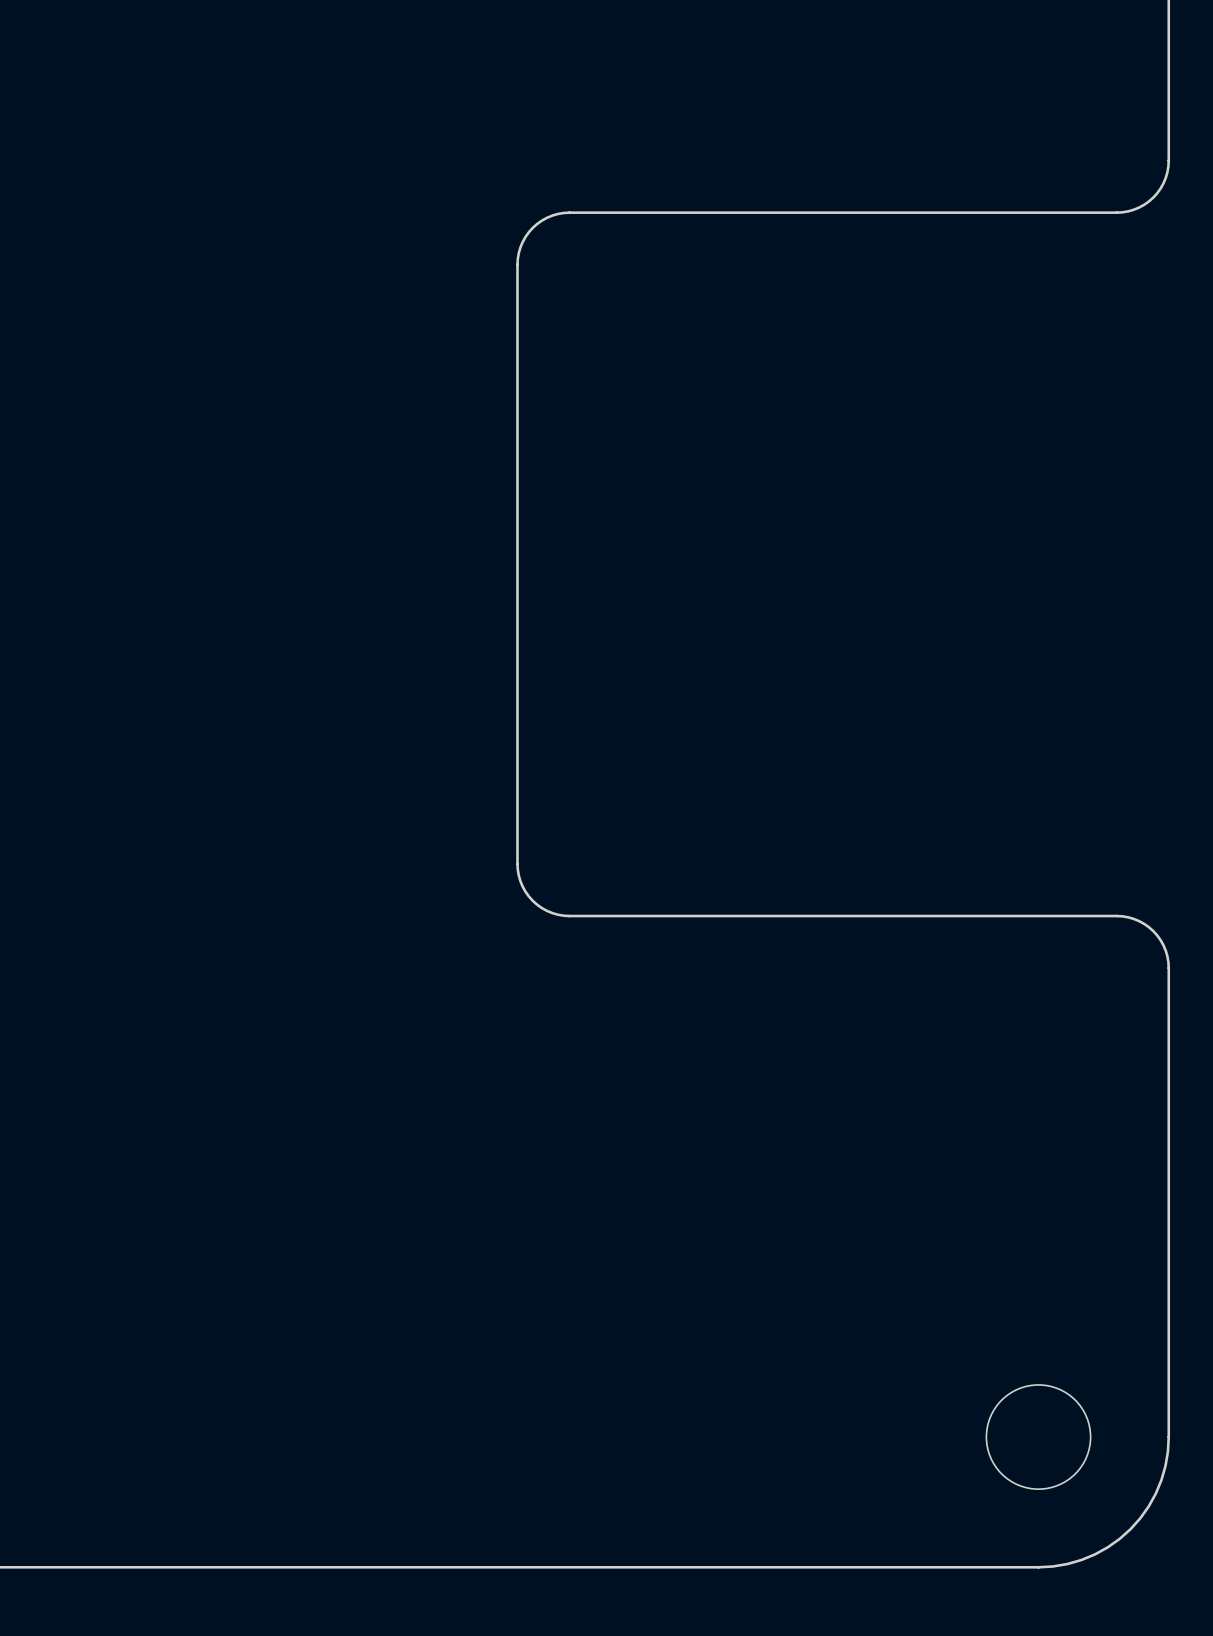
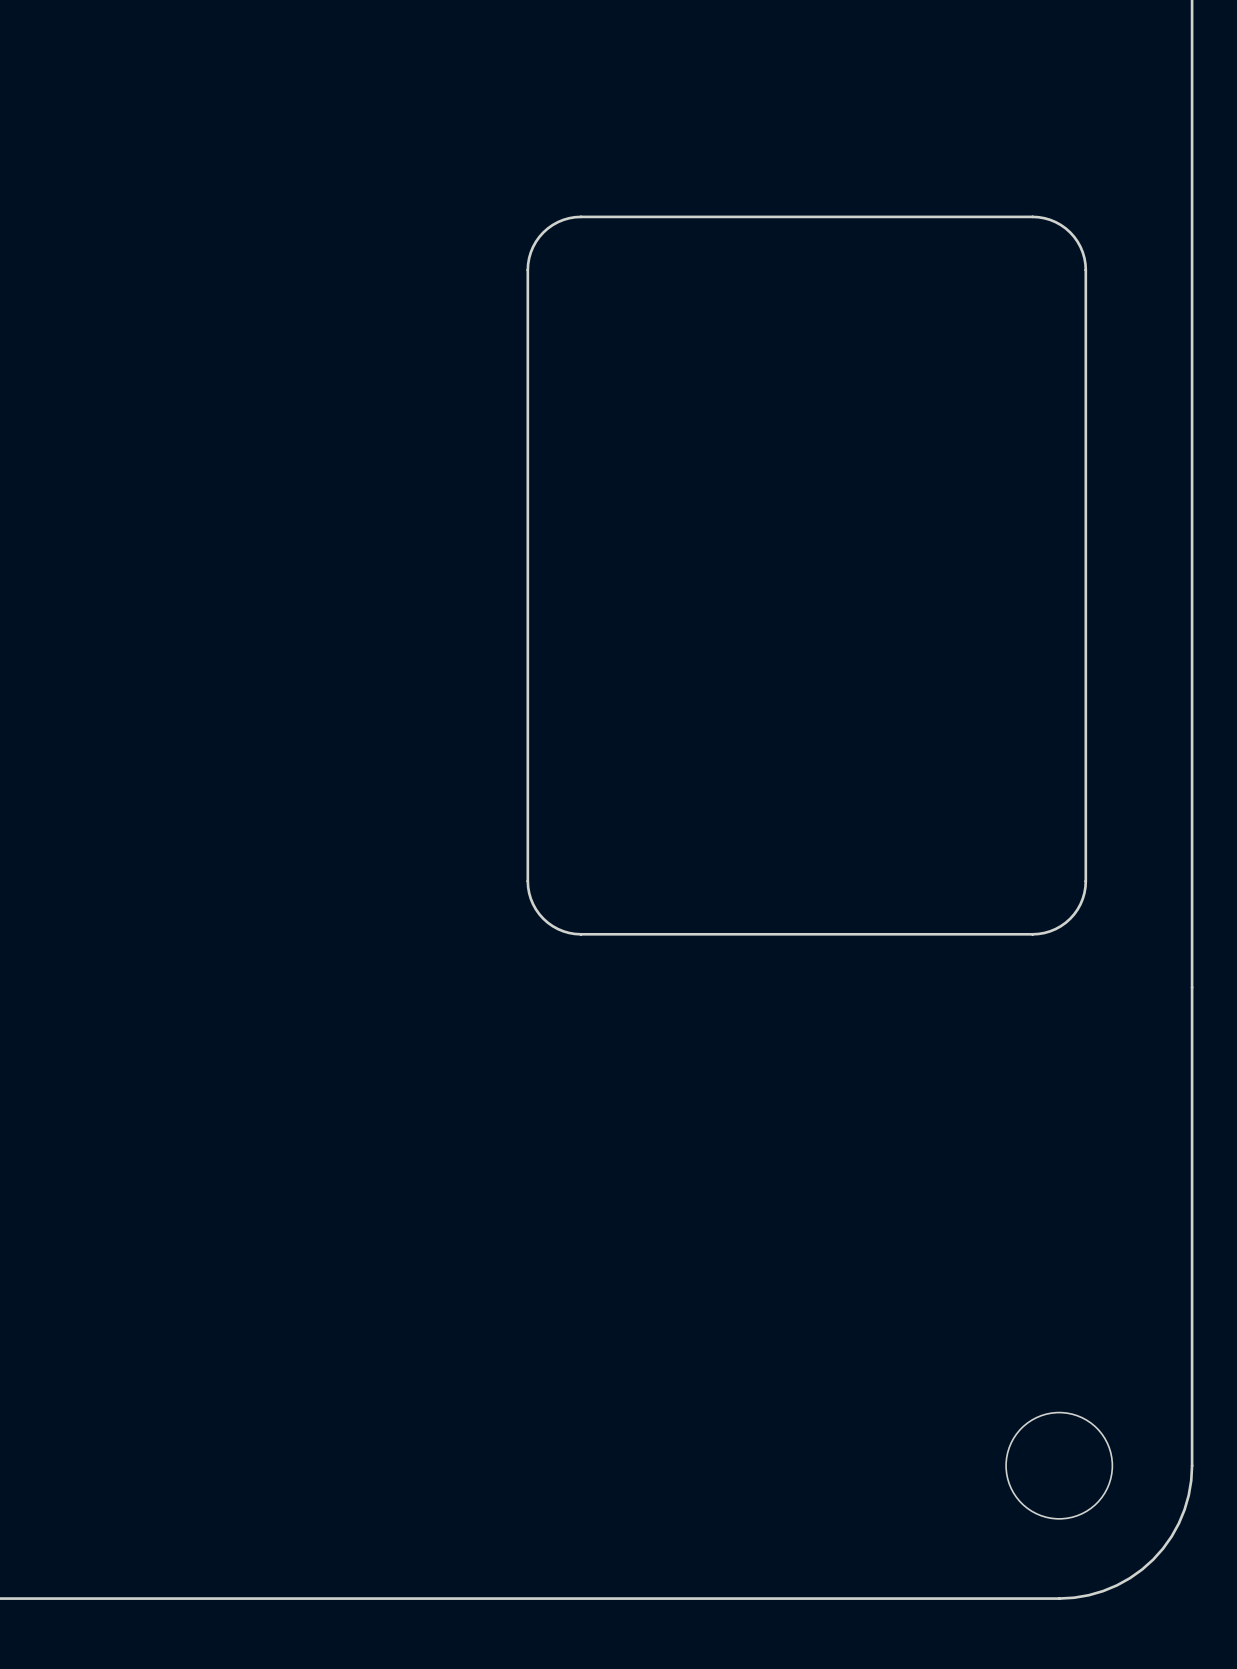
board edge: (1168, 160) (1165, 177) (1157, 193) (1149, 201) (1133, 209) (1116, 212) (1012, 212) -> (1192, 163) (1192, 987)
board edge: (1012, 916) (1116, 916) (1133, 918) (1149, 927) (1160, 940) (1167, 956) (1168, 968) -> (1032, 934) (1055, 929) (1070, 918) (1080, 904) (1085, 881) (1085, 264) (1080, 246) (1065, 228) (1050, 219) (1032, 216)

